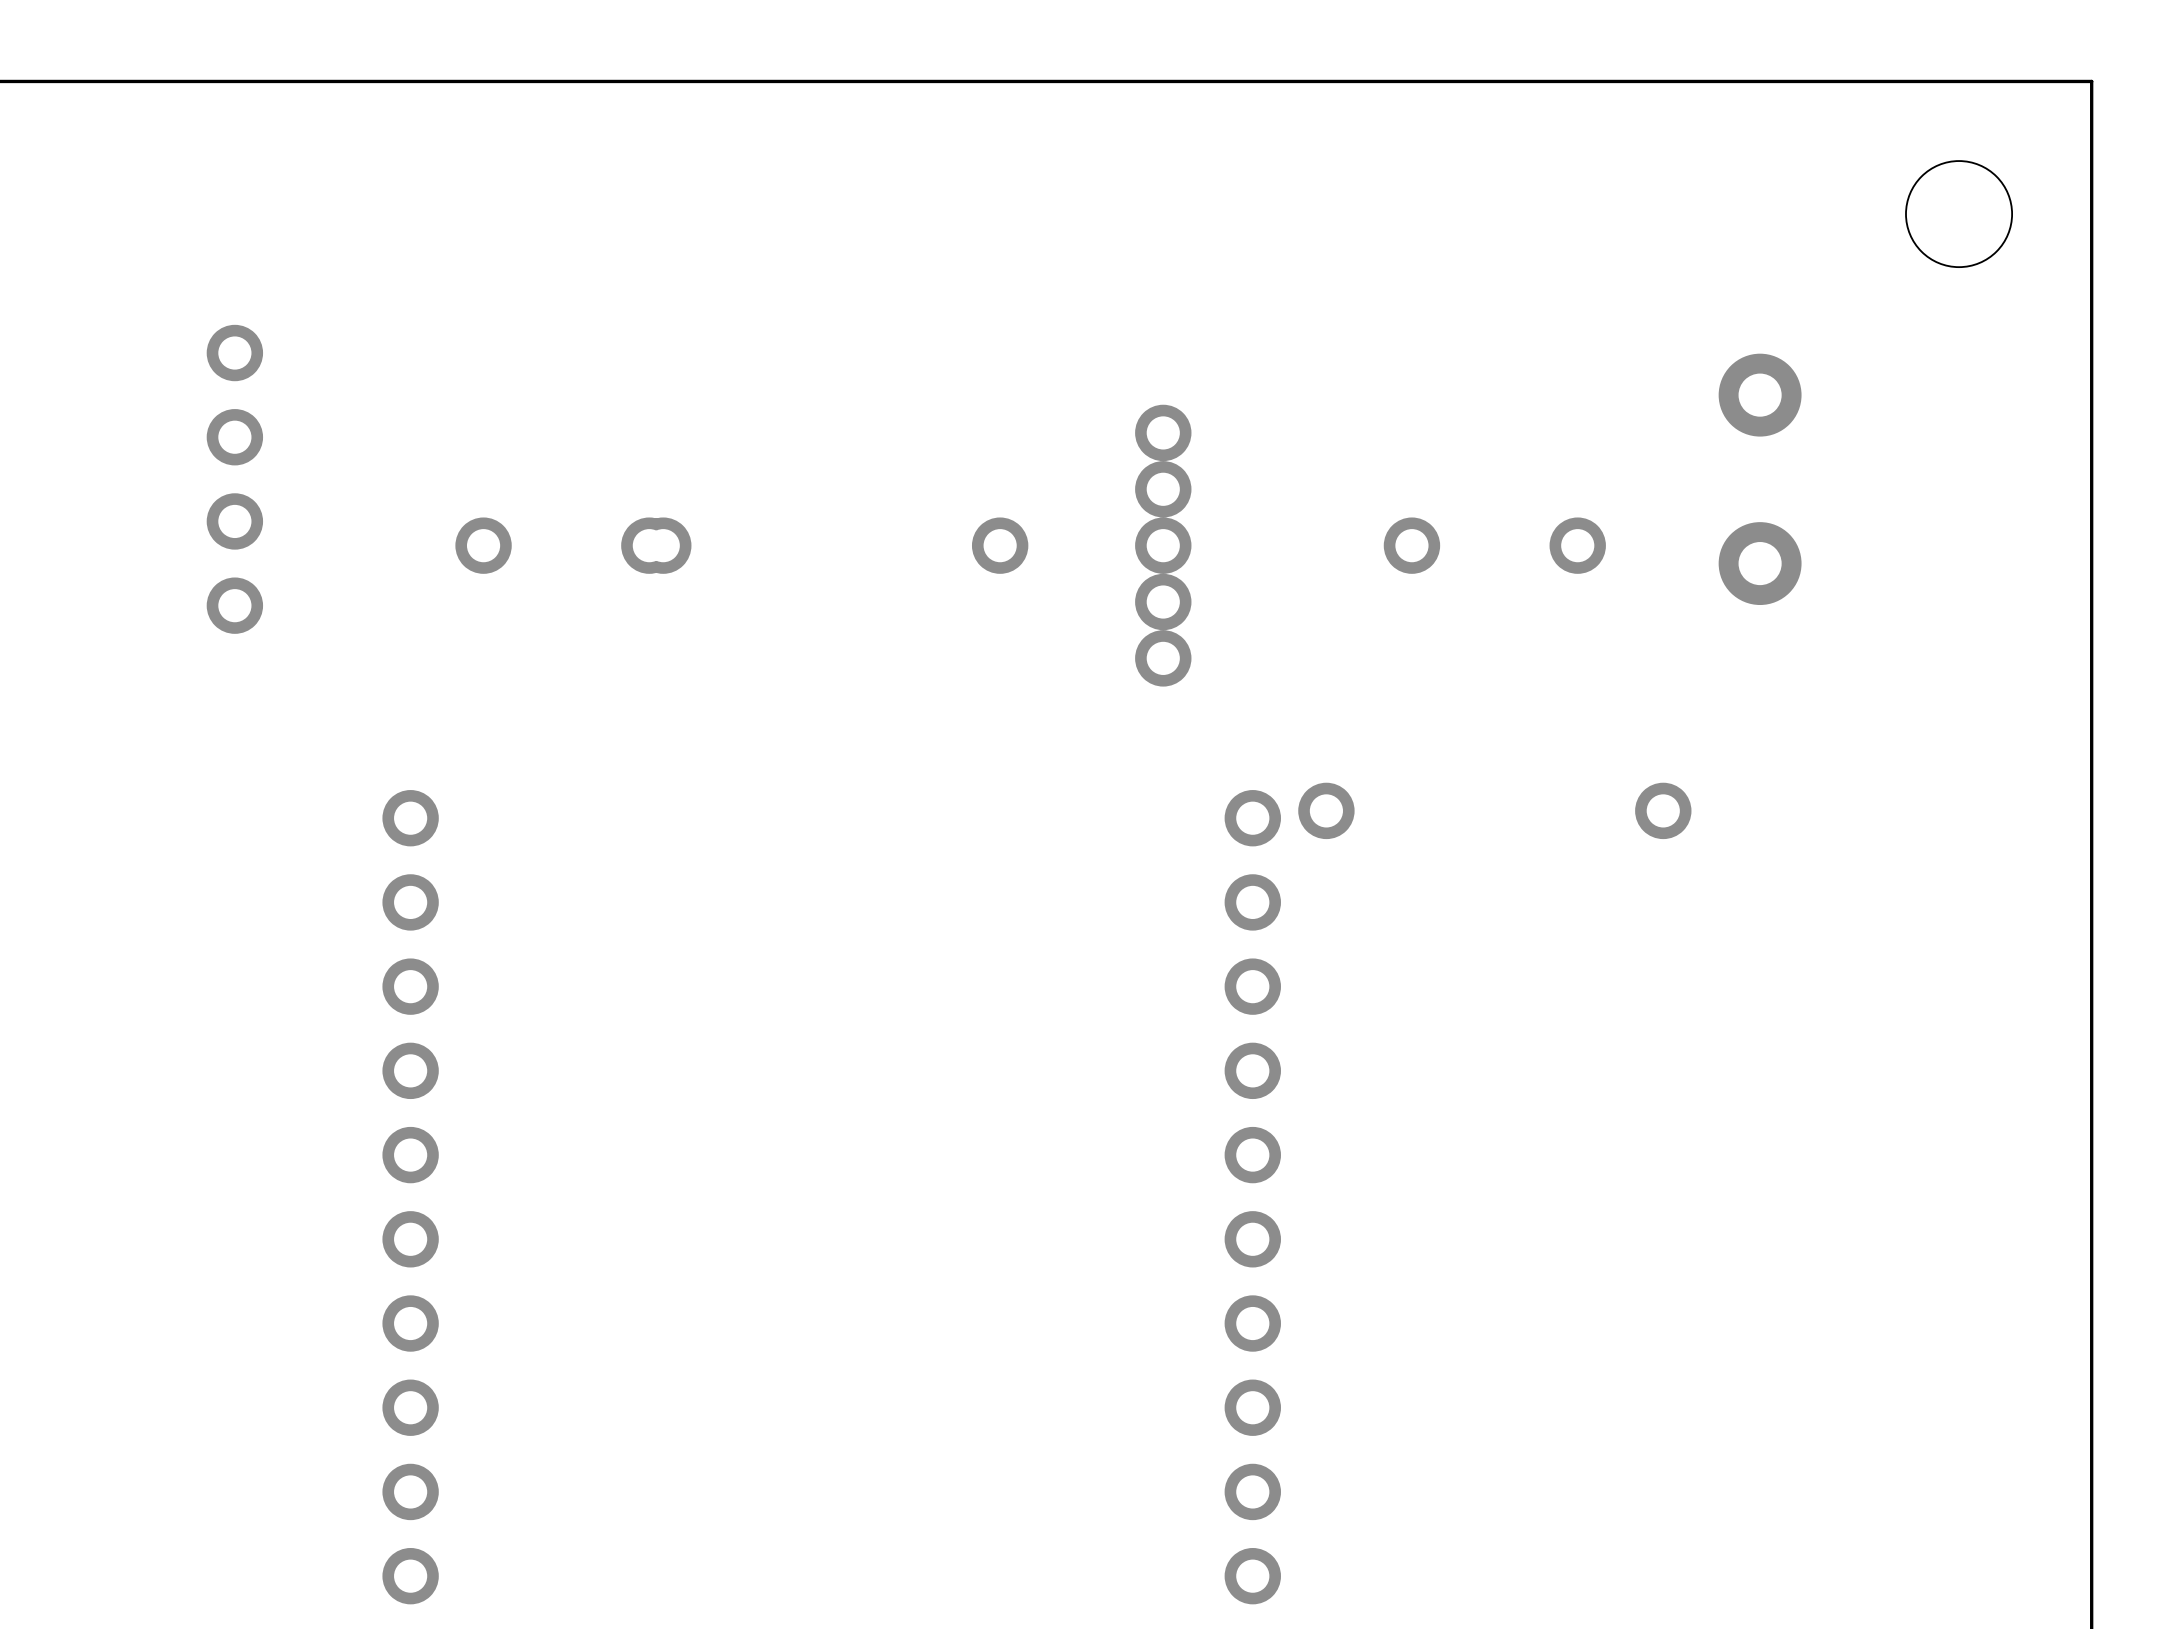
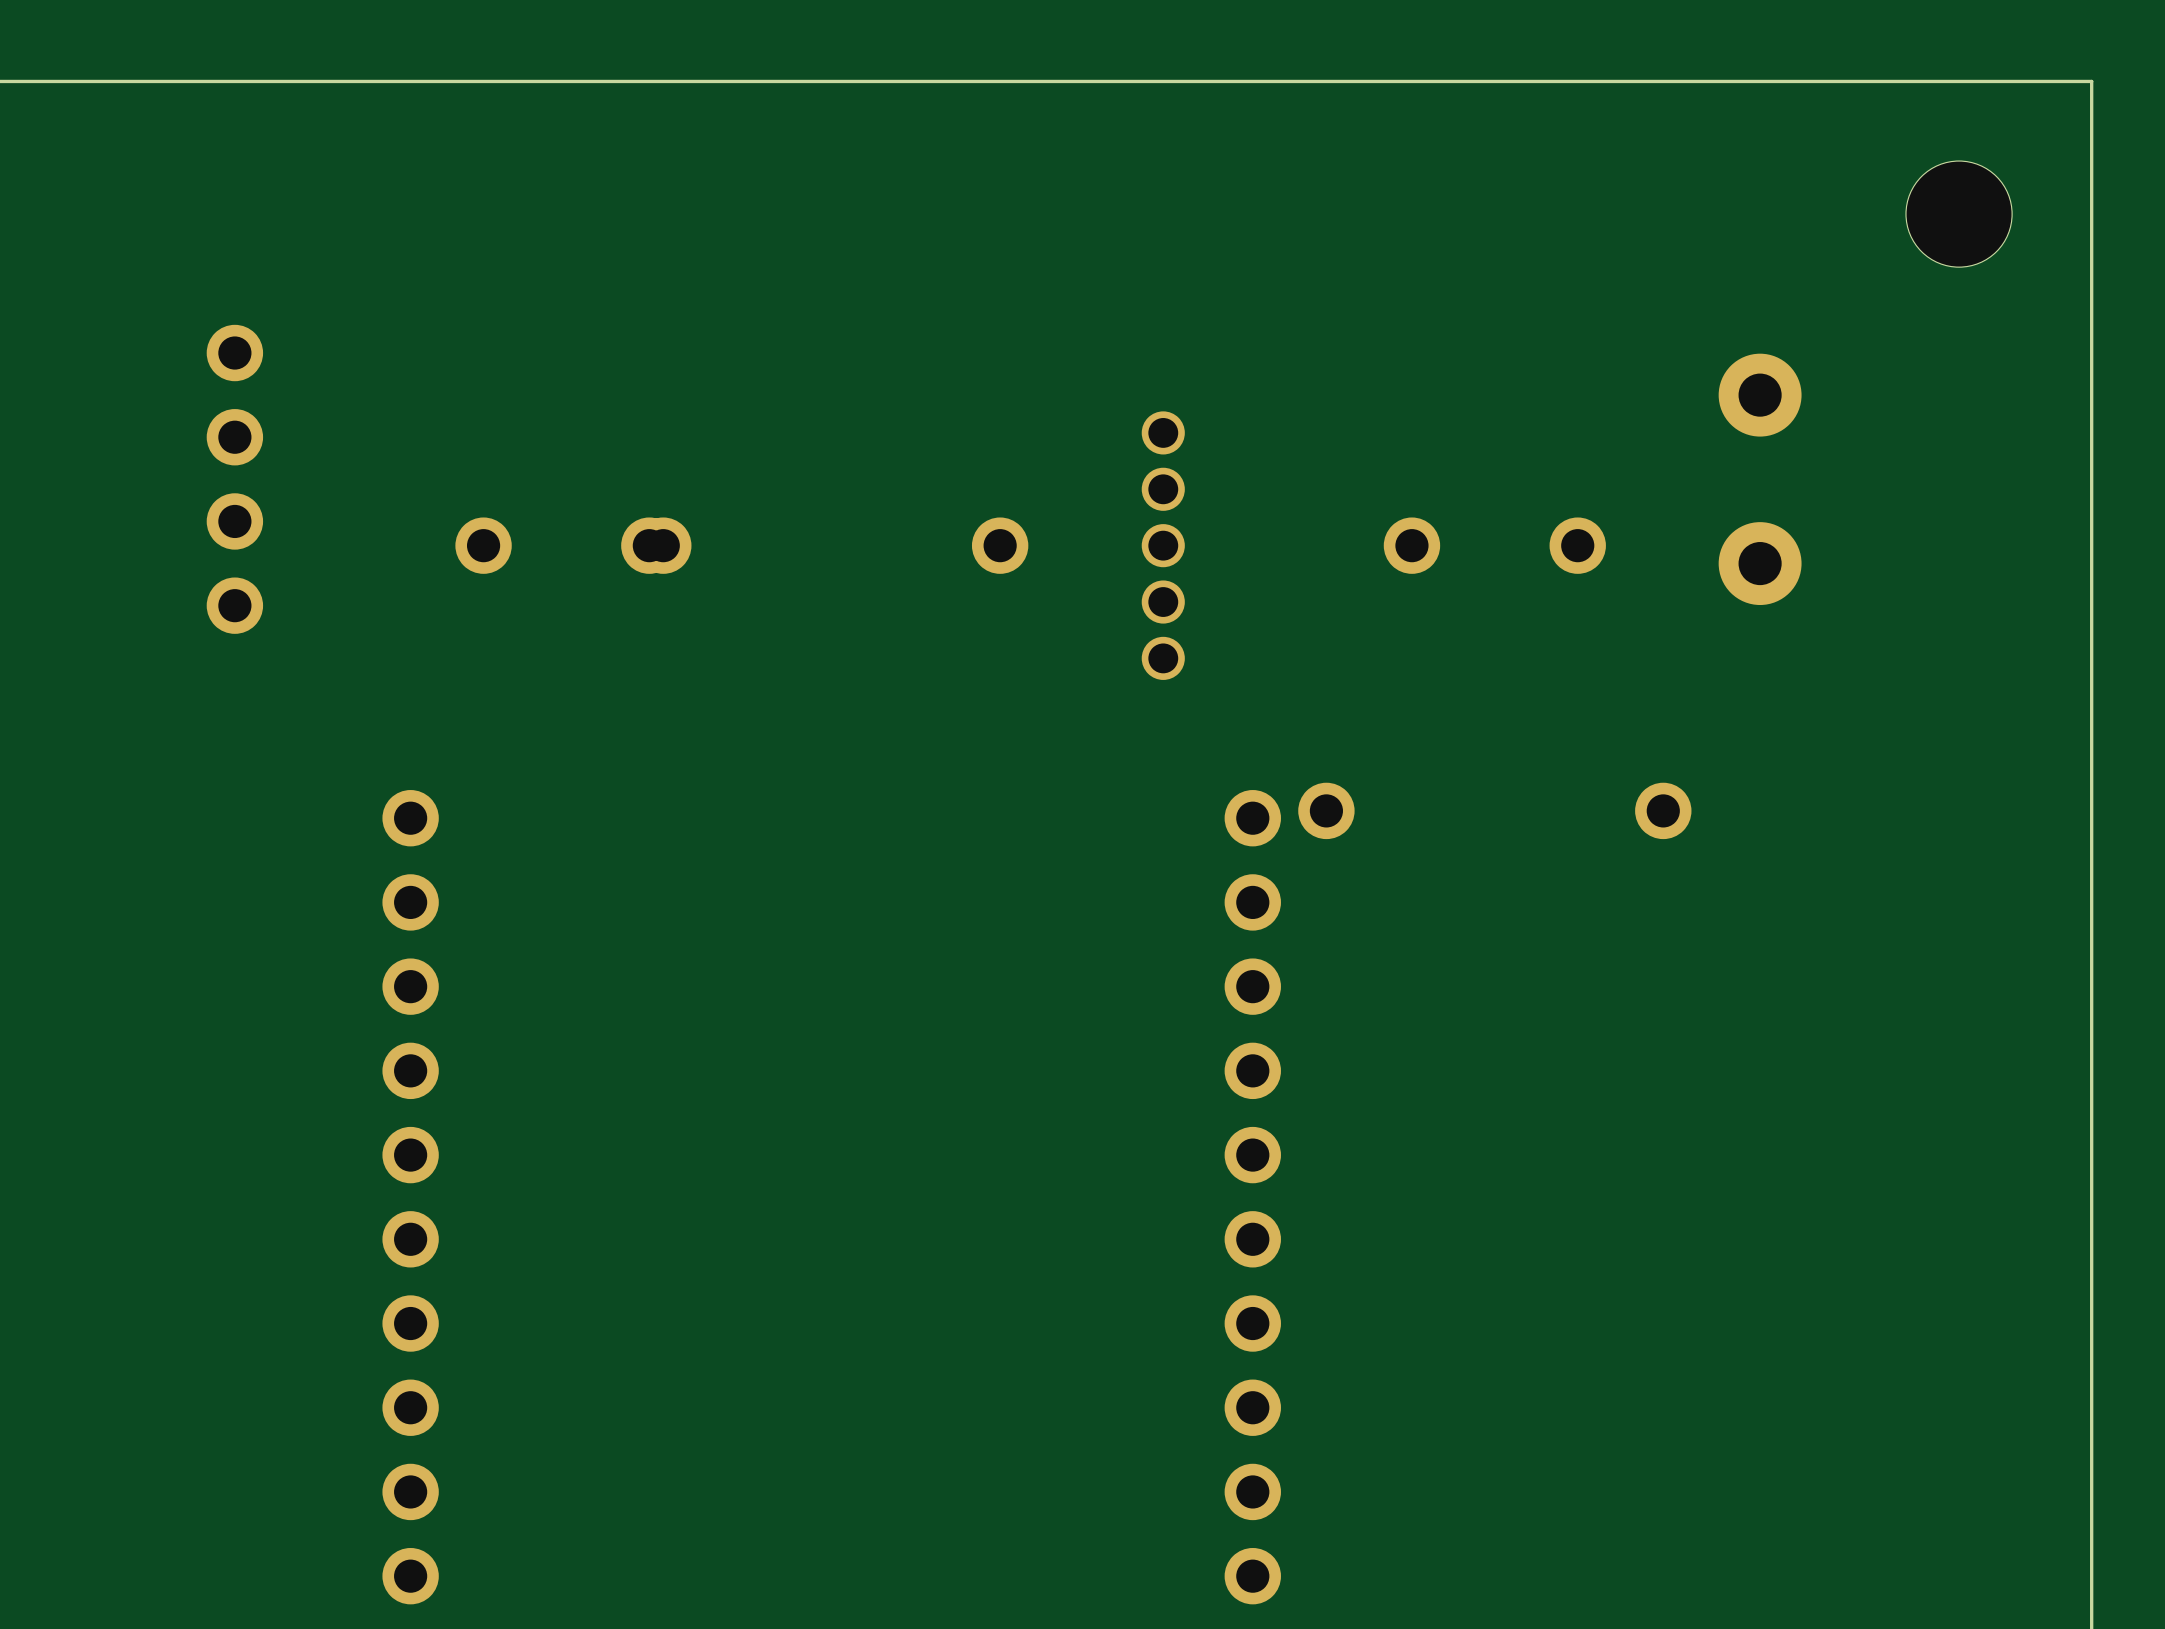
part footprint: [1135, 404, 1192, 687] -> [1141, 411, 1185, 680]

